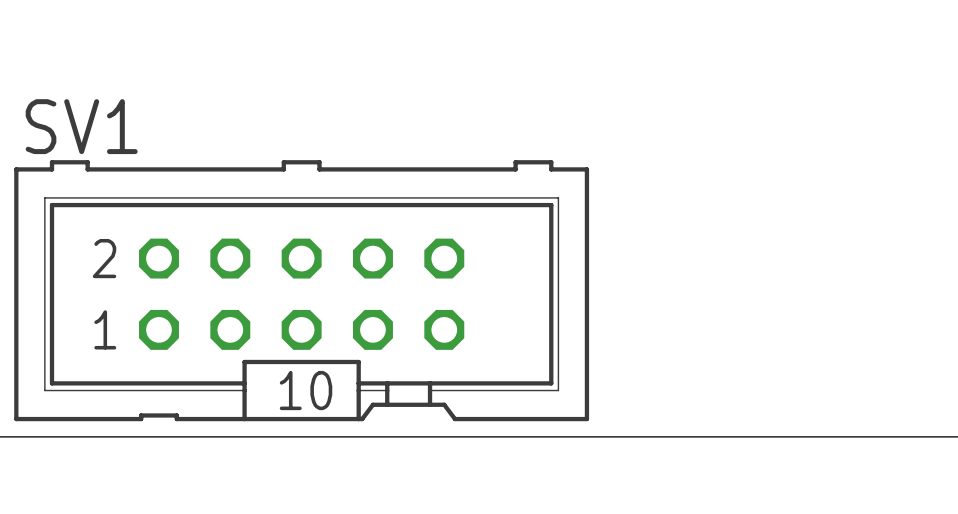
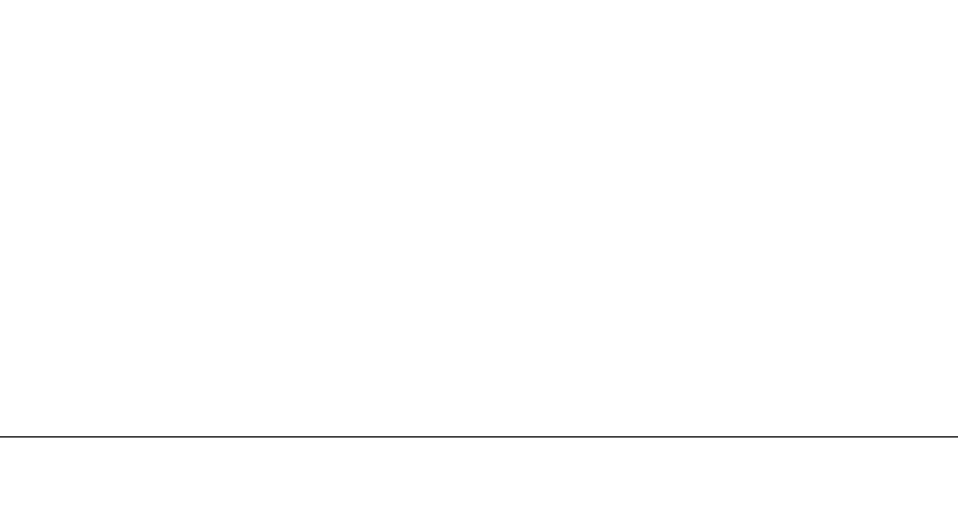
SV1: (301, 290) -> none

